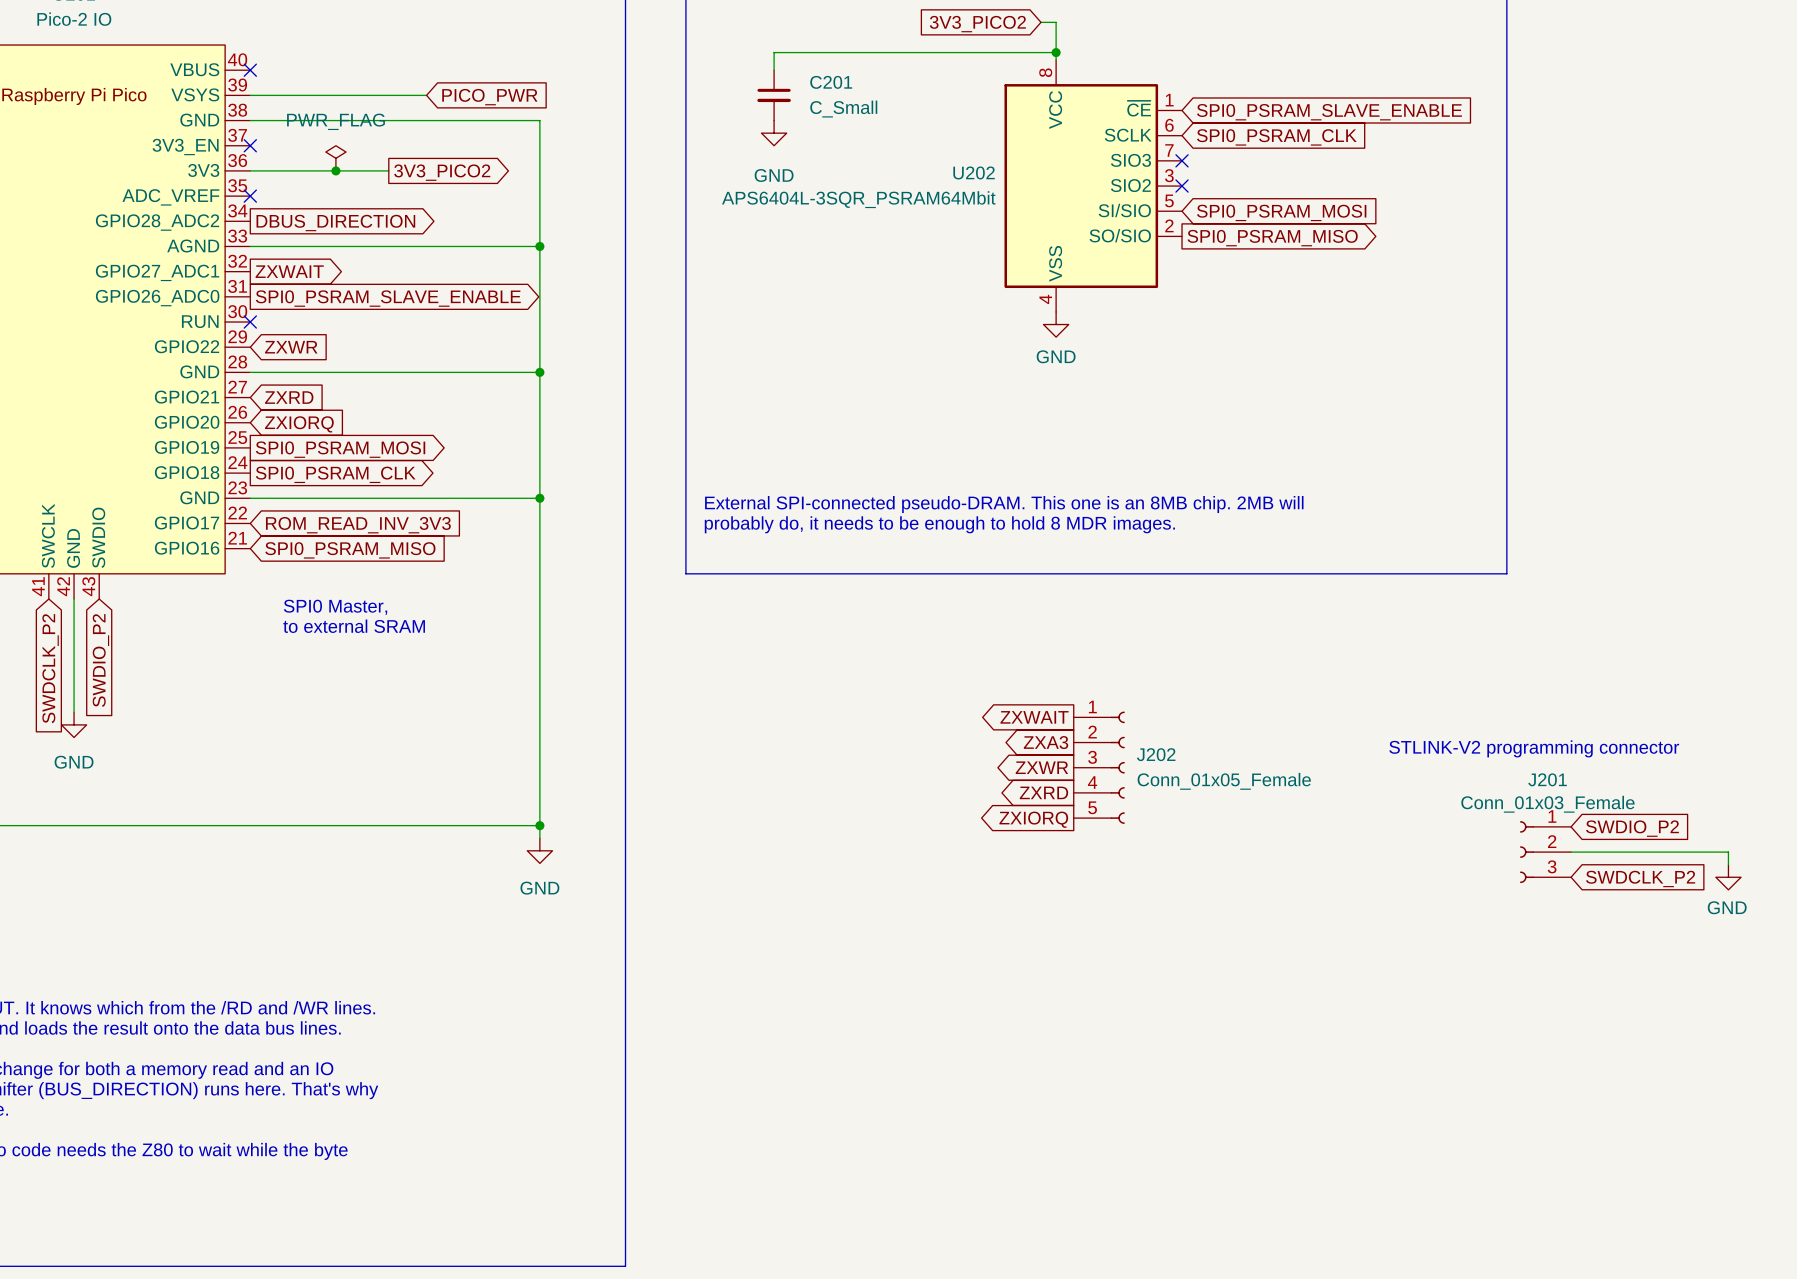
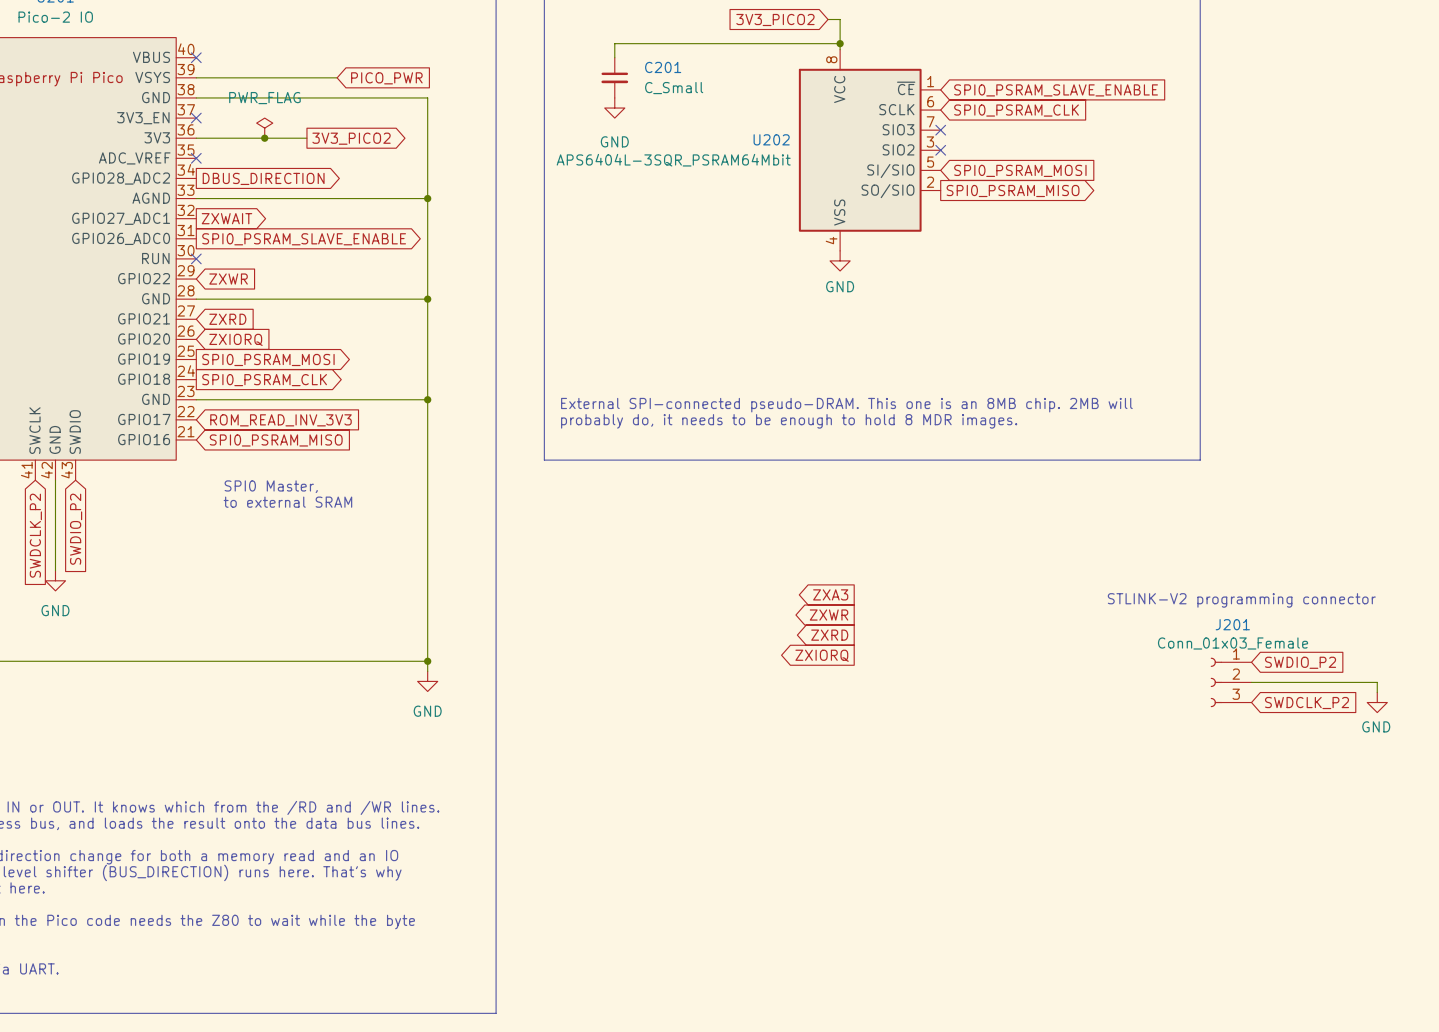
global label: ZXWAIT (1034, 717) -> none
J202: Conn_01x05_Female (1099, 767) -> none

